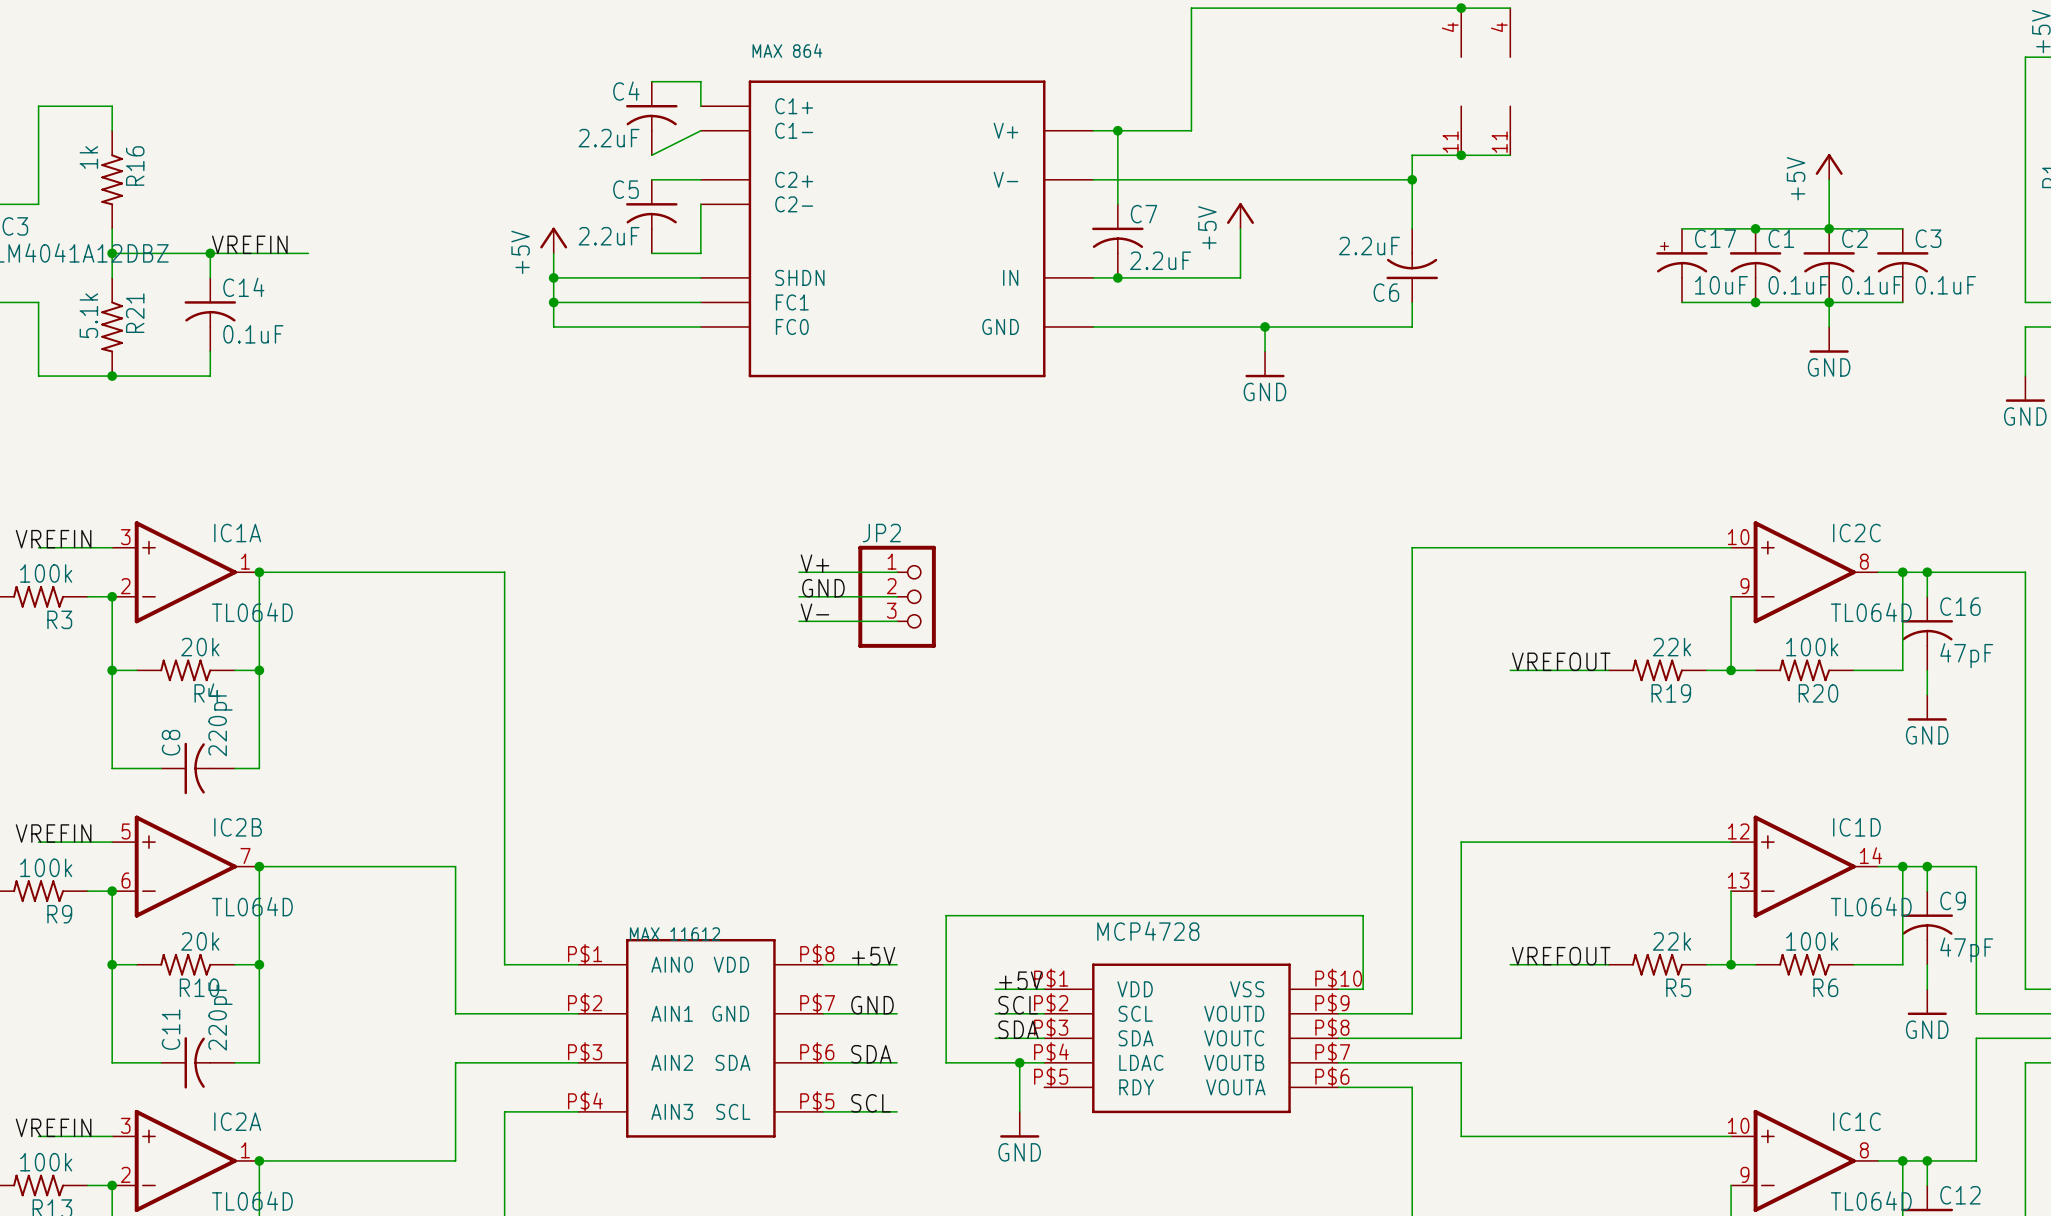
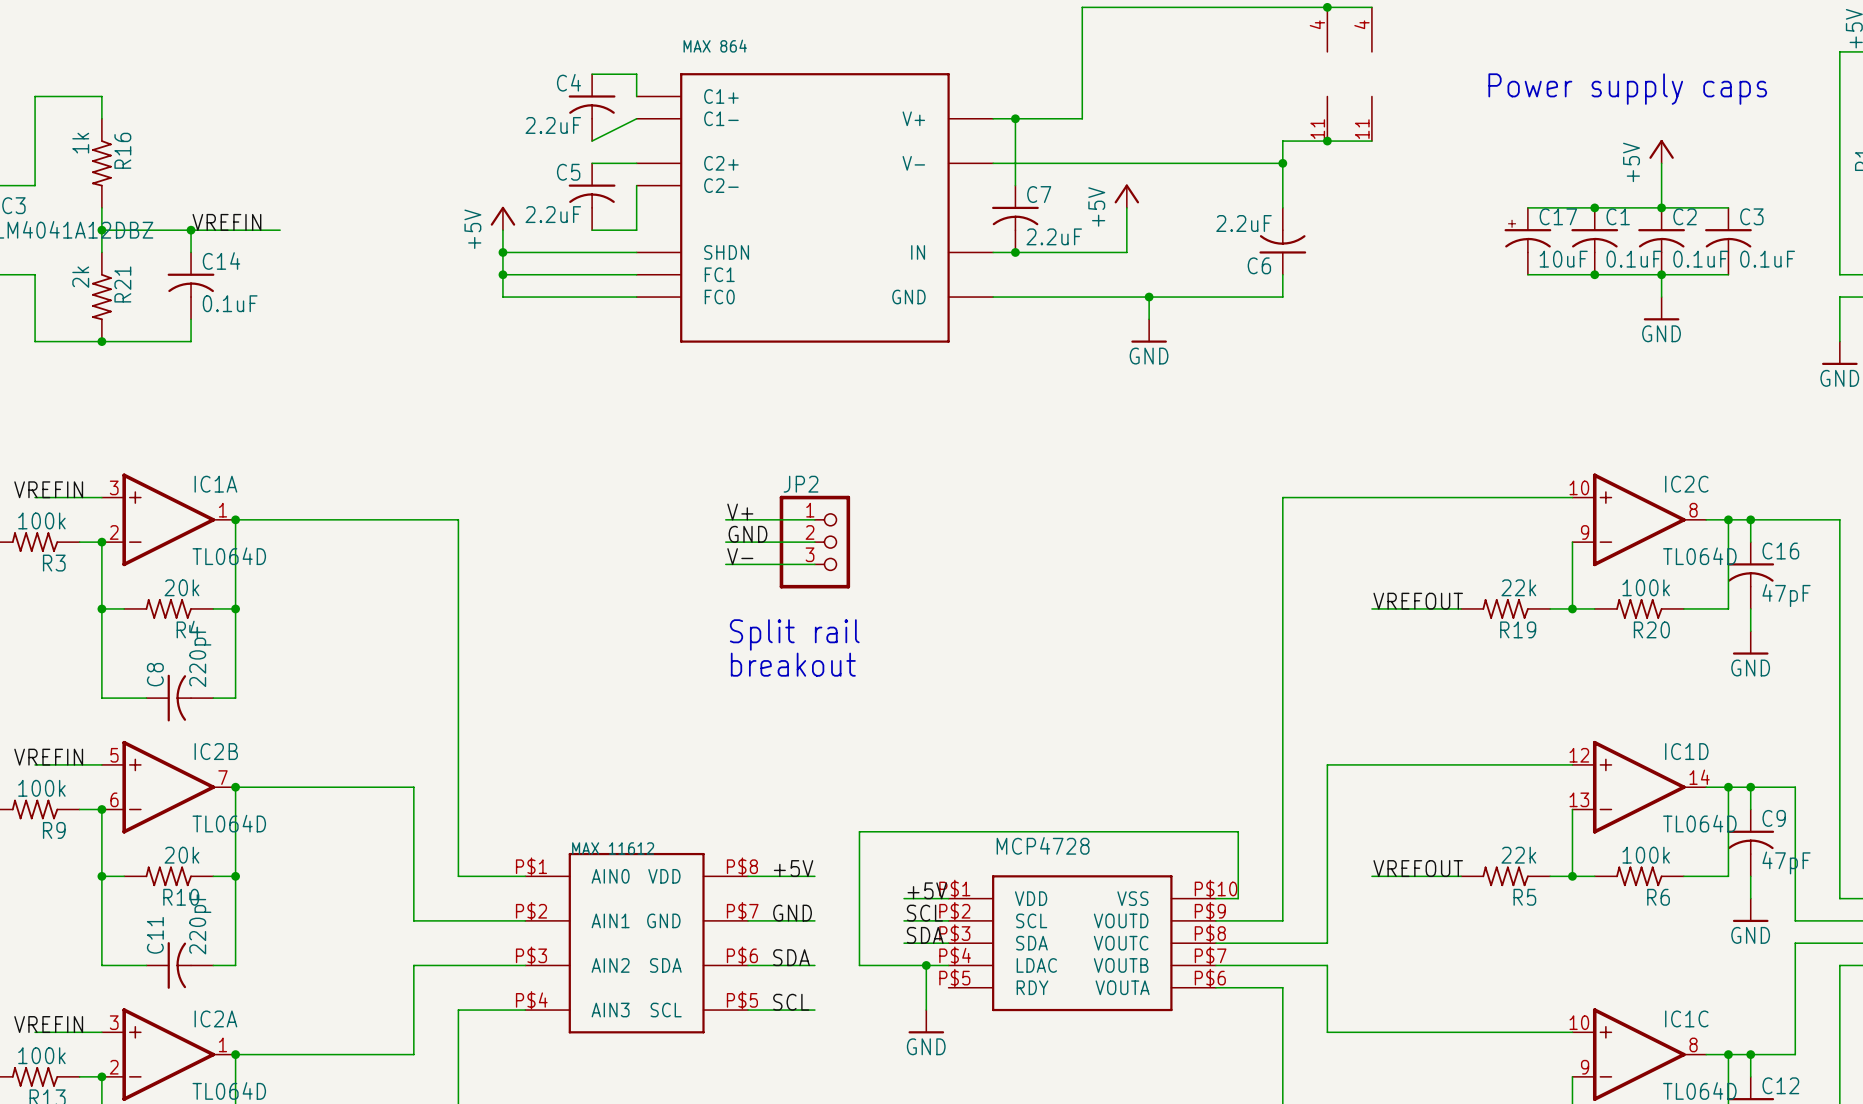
text: none -> Power supply caps (1627, 89)
R21 value: 5.1k (88, 315) -> 2k (80, 277)
text: none -> Split rail (794, 634)
text: none -> breakout (793, 664)

